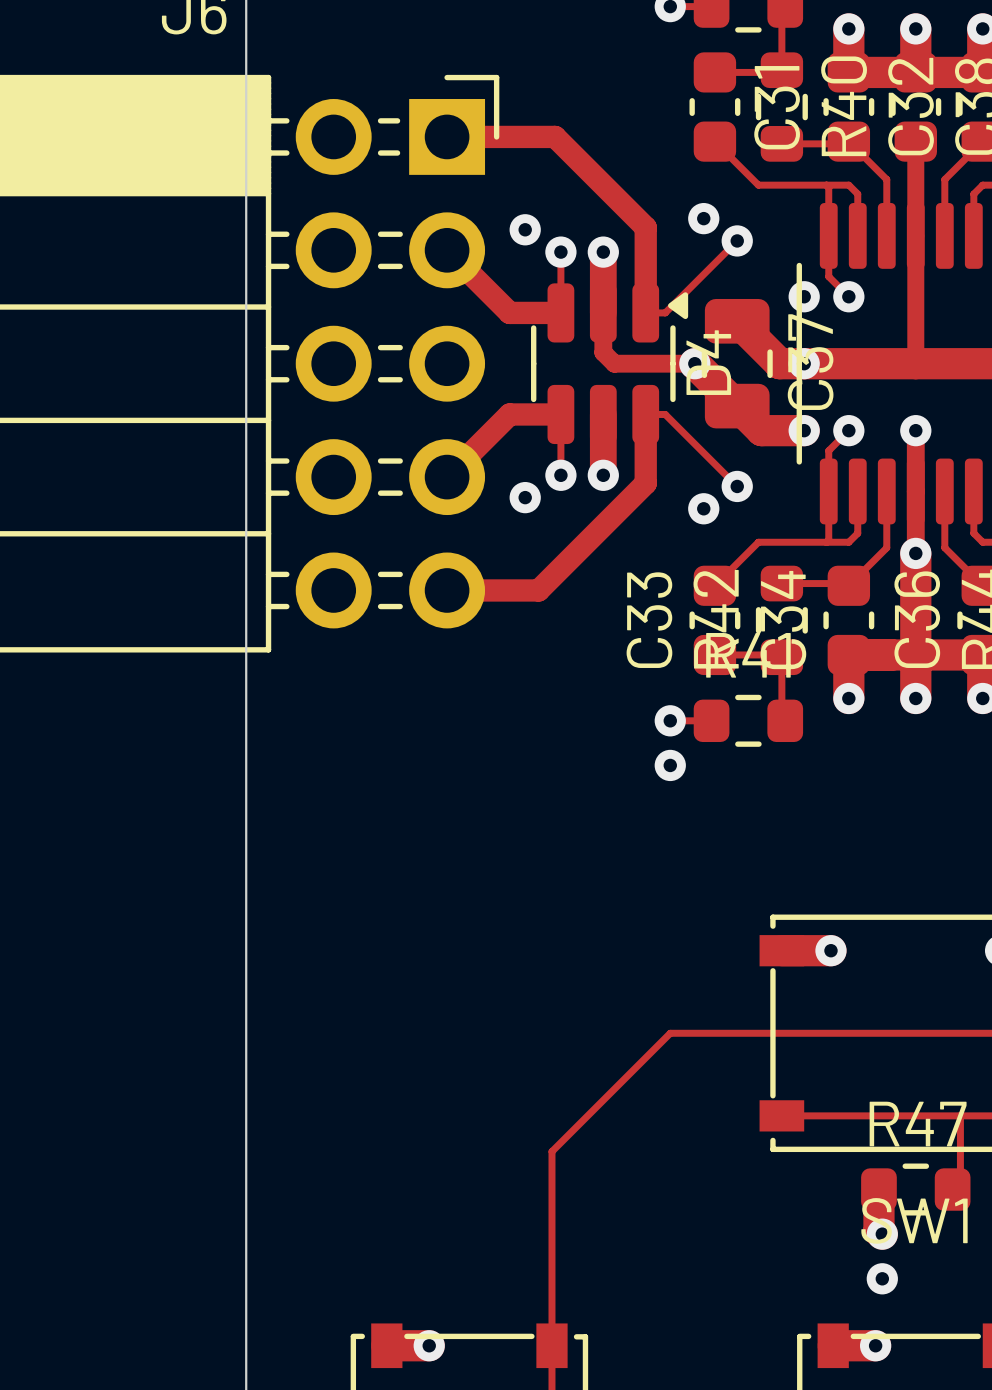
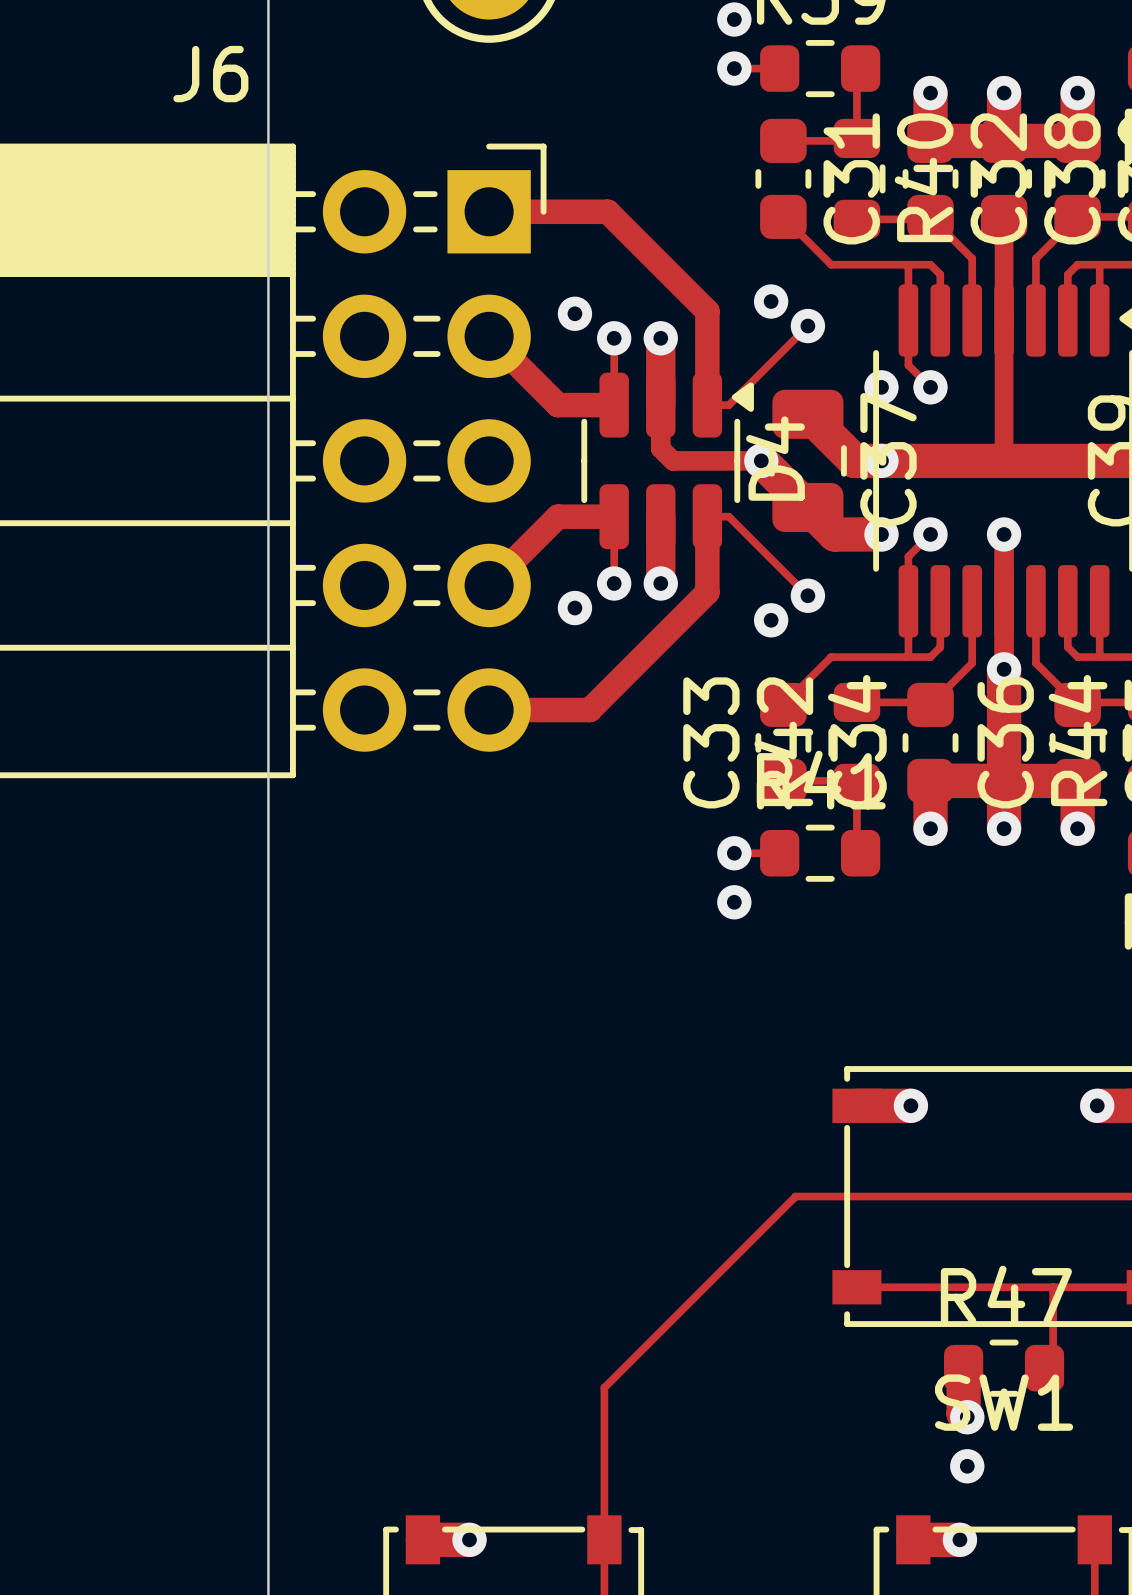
track: (726, 1033) (670, 1033) (551, 1151) (551, 1207) -> (795, 1196) (604, 1387)

